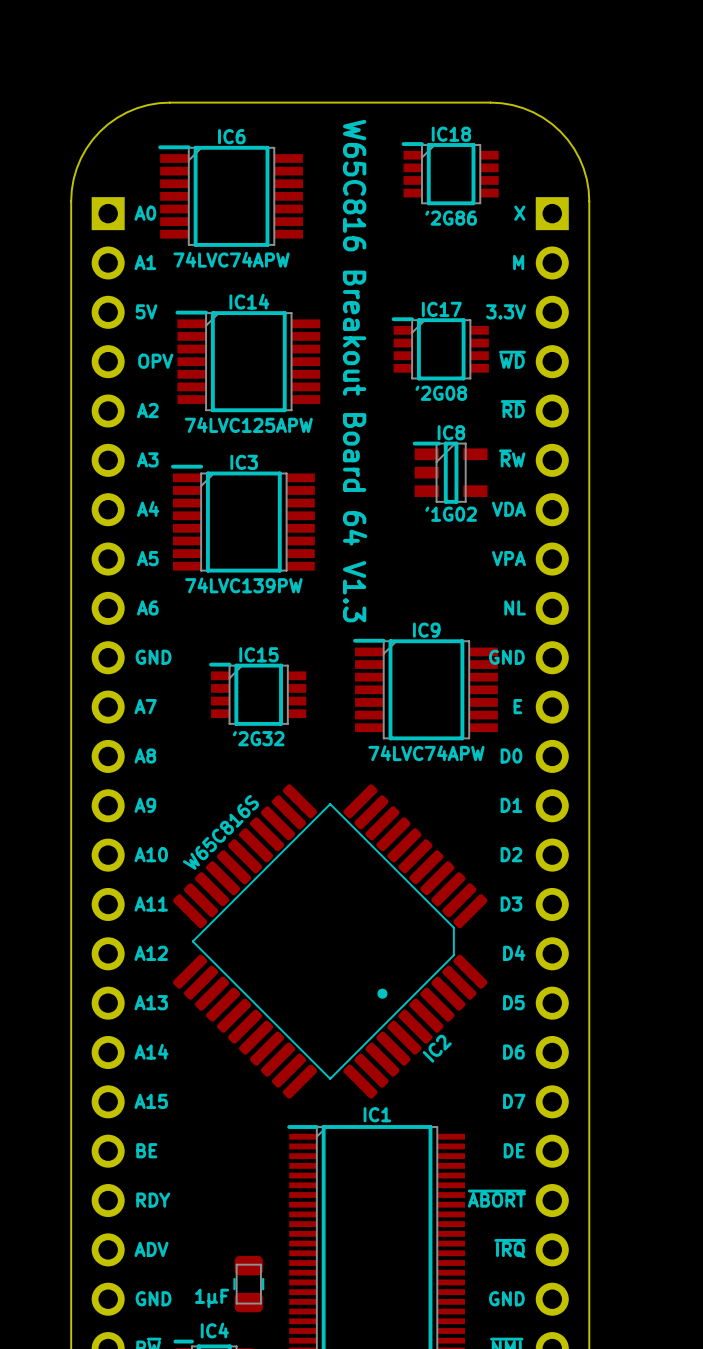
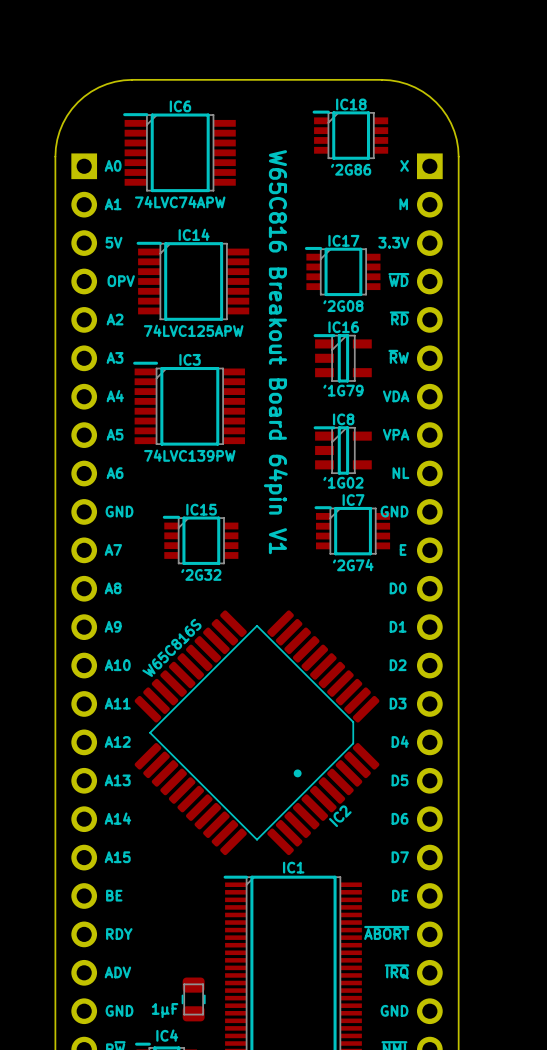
text: W65C816 Breakout Board 64 V1.3 (355, 371) -> W65C816 Breakout Board 64pin V1 (275, 352)
IC16: none -> (342, 358)
IC8 position: (450, 472) -> (342, 450)
IC7: none -> (352, 530)
IC9: (425, 689) -> none

